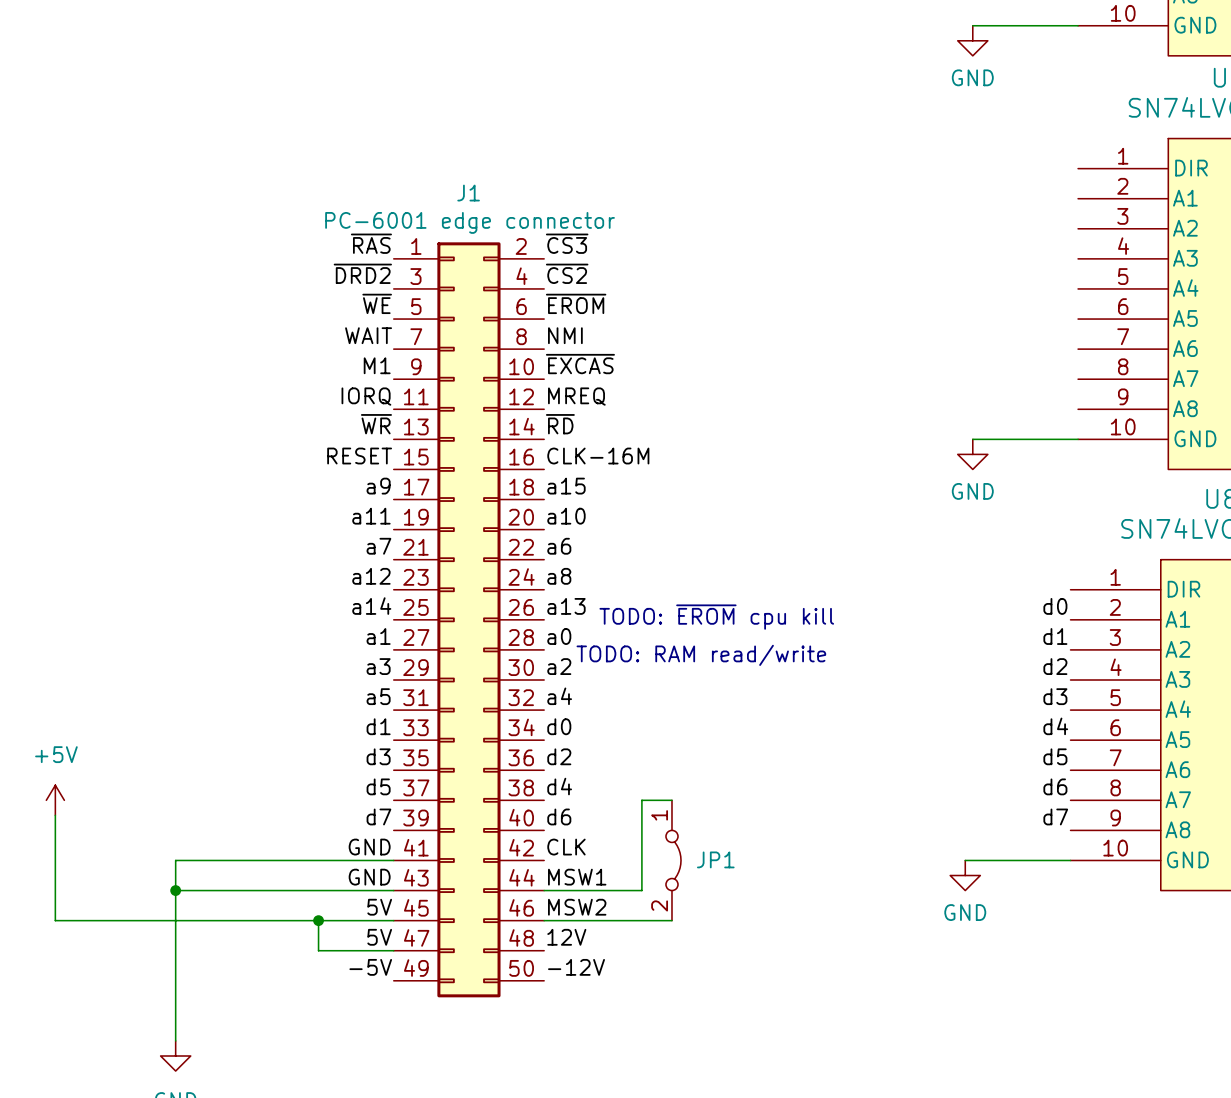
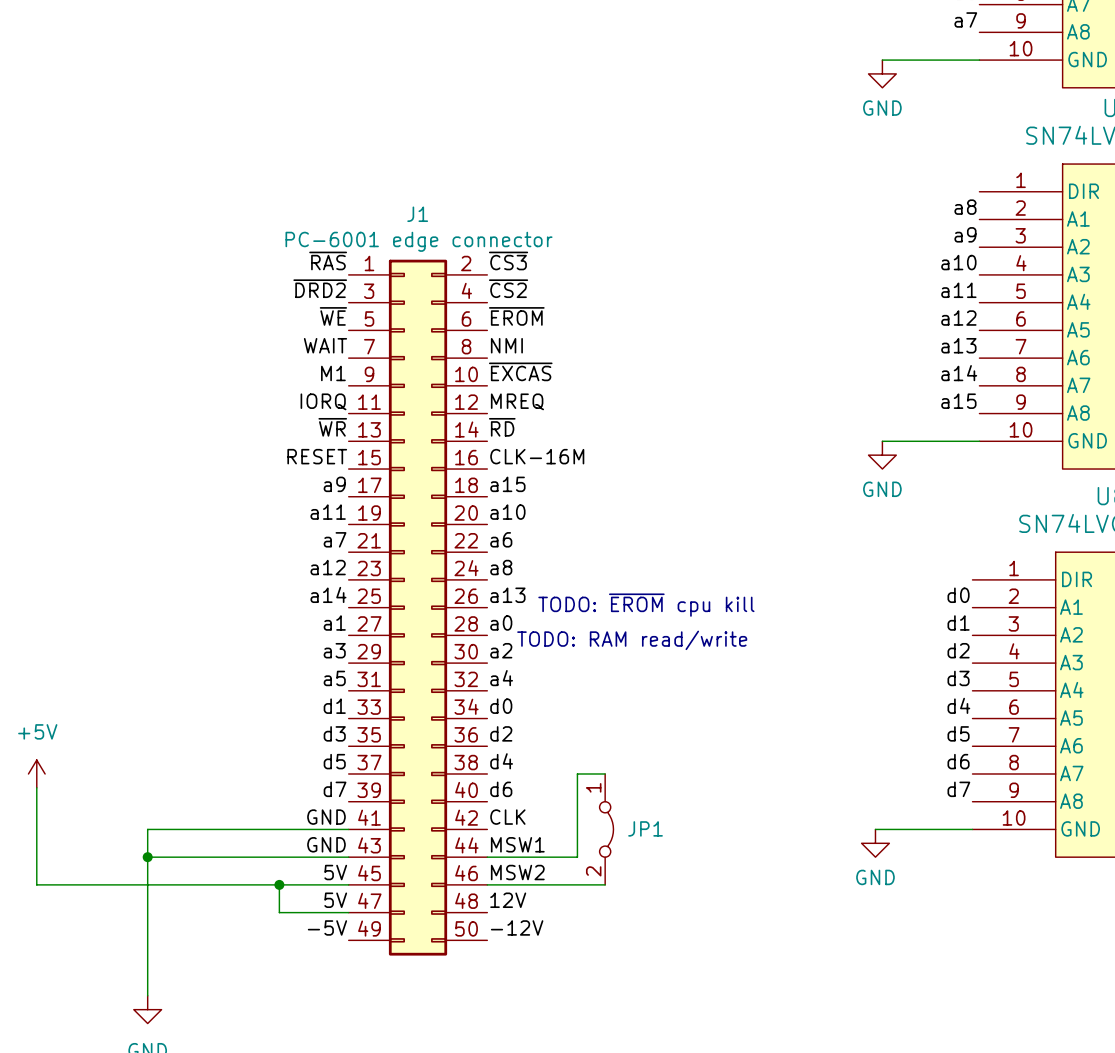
label: none -> a8 (965, 207)
label: none -> a9 (965, 234)
label: none -> a10 (958, 262)
label: none -> a11 (958, 290)
label: none -> a12 (958, 318)
label: none -> a13 (958, 345)
label: none -> a14 (959, 373)
label: none -> a15 (958, 401)

